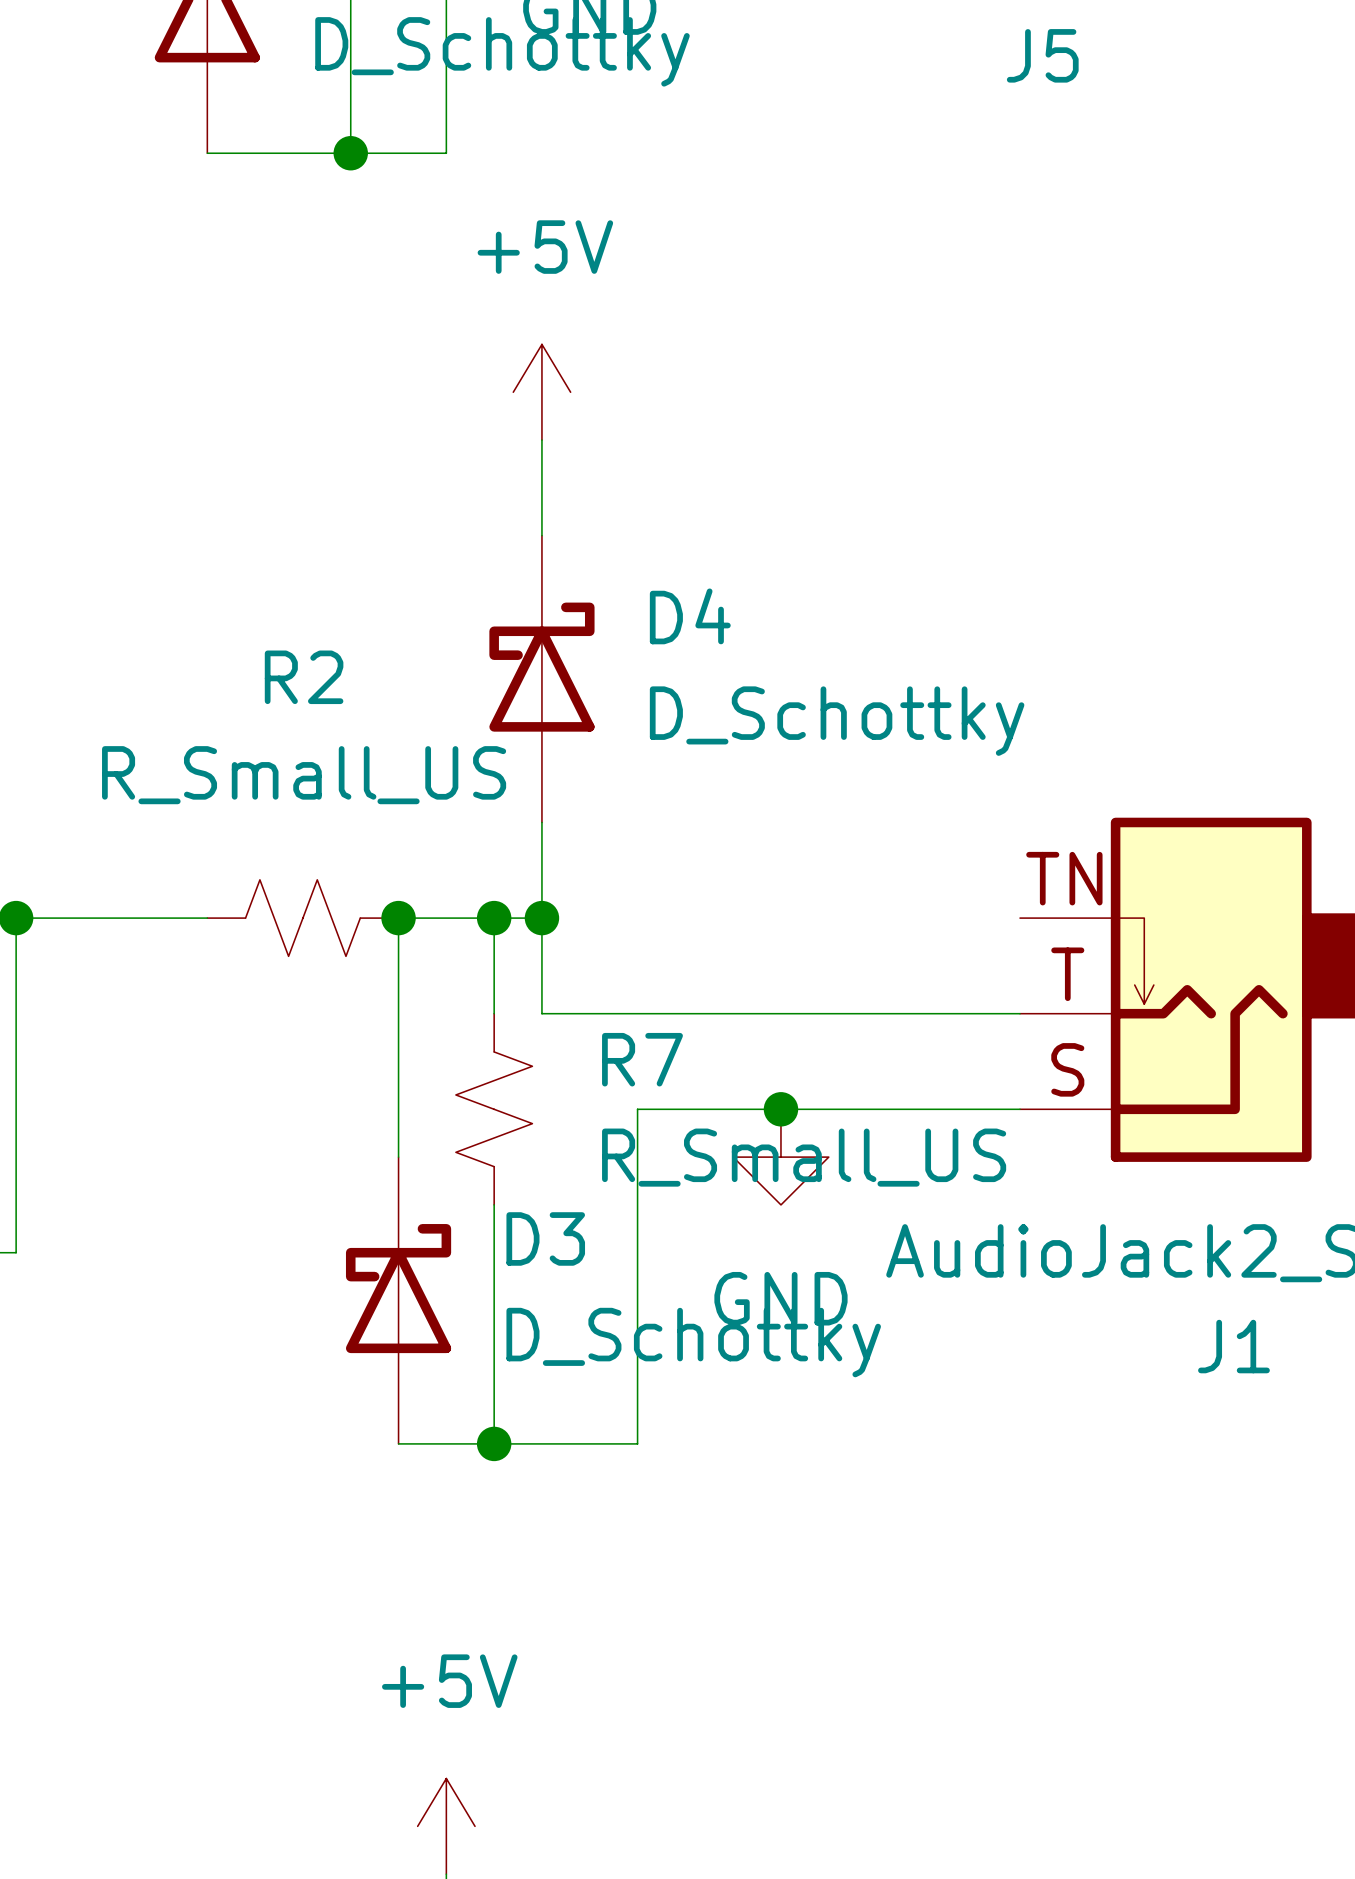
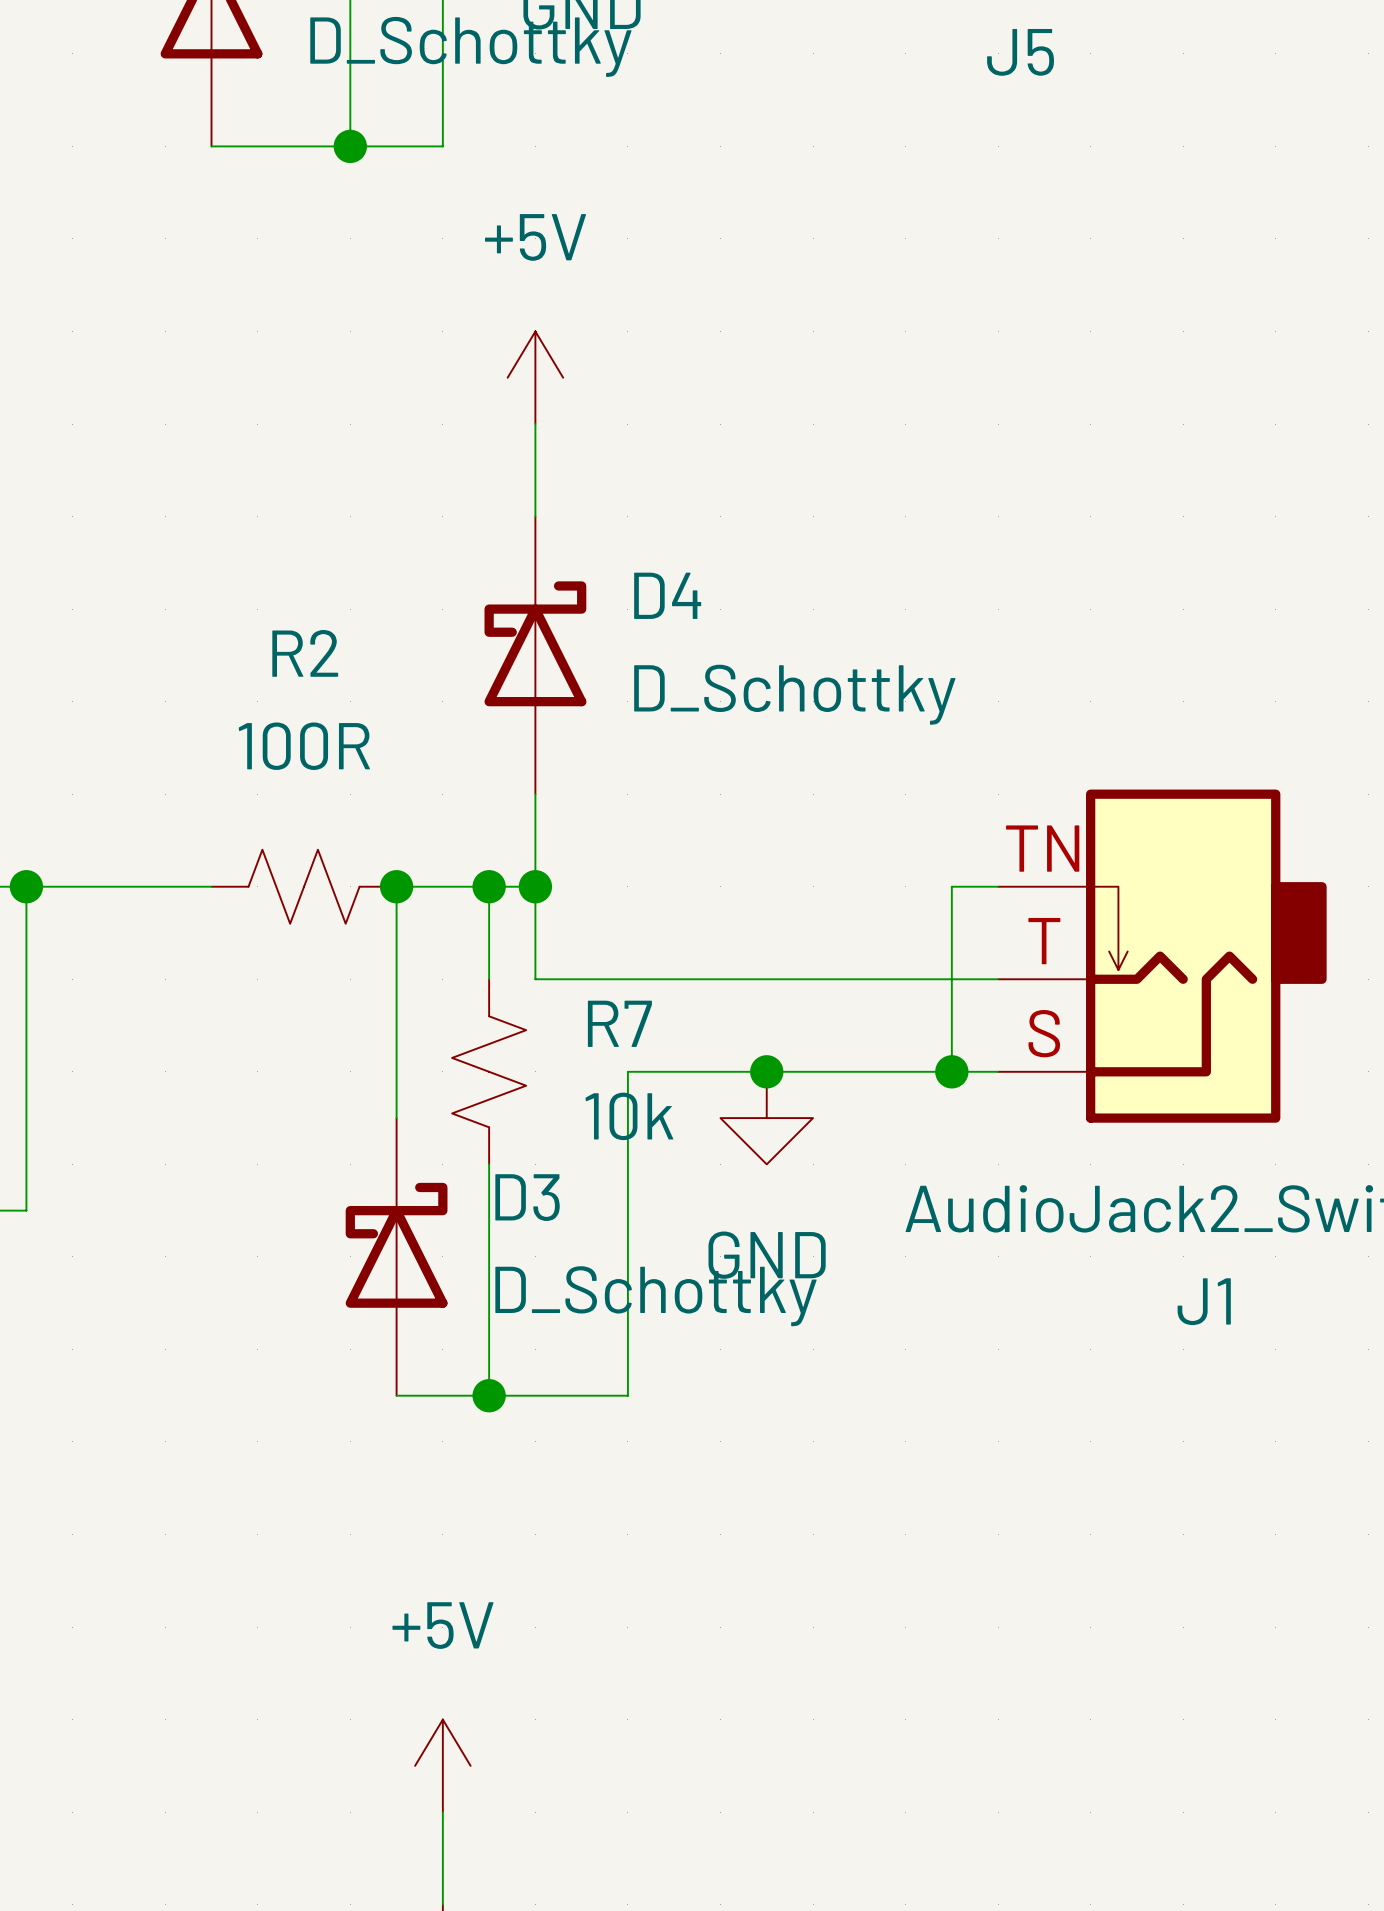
R2 value: R_Small_US (304, 775) -> 100R (304, 746)
wire: none -> (998, 886) (951, 886) (951, 1071)
junction: none -> (951, 1071)
R7 value: R_Small_US (804, 1157) -> 10k (629, 1116)

